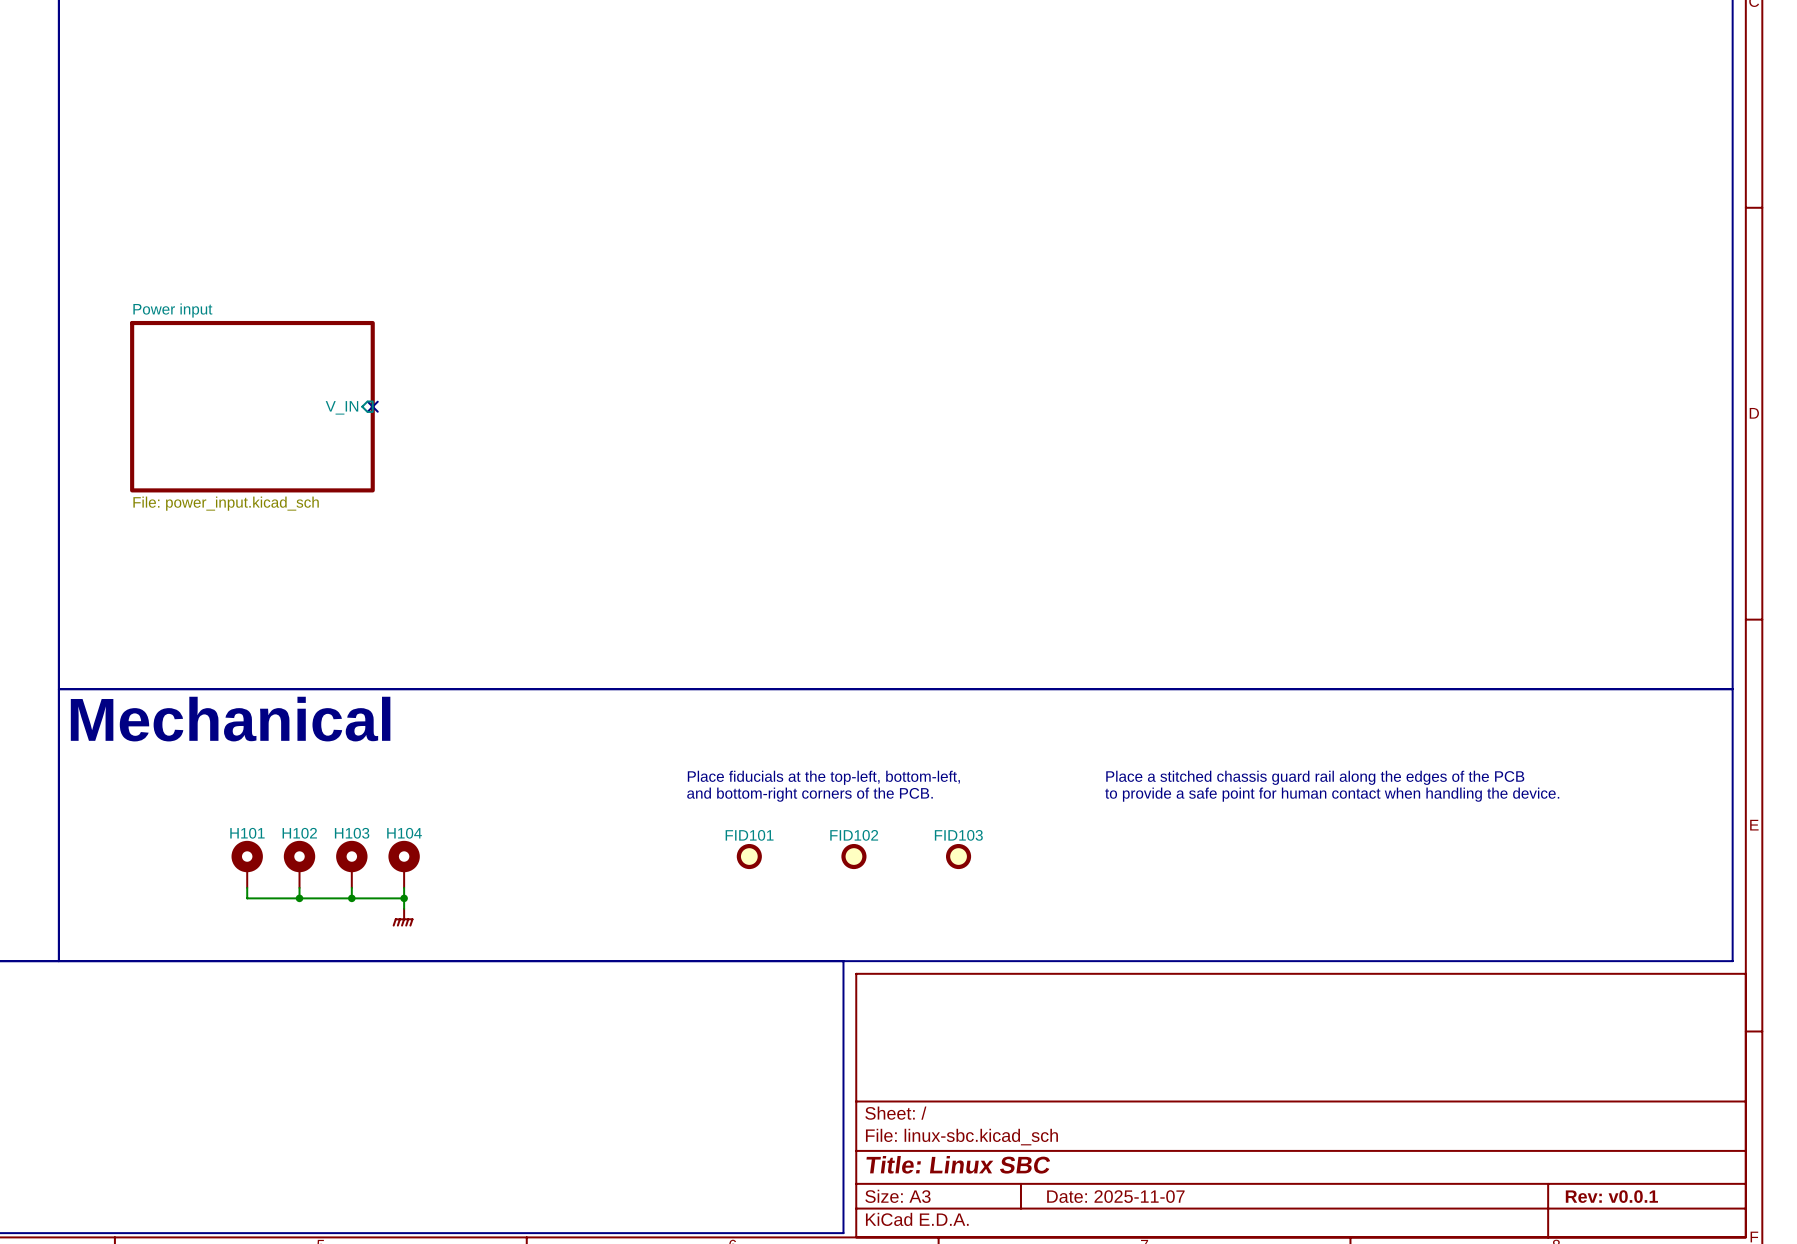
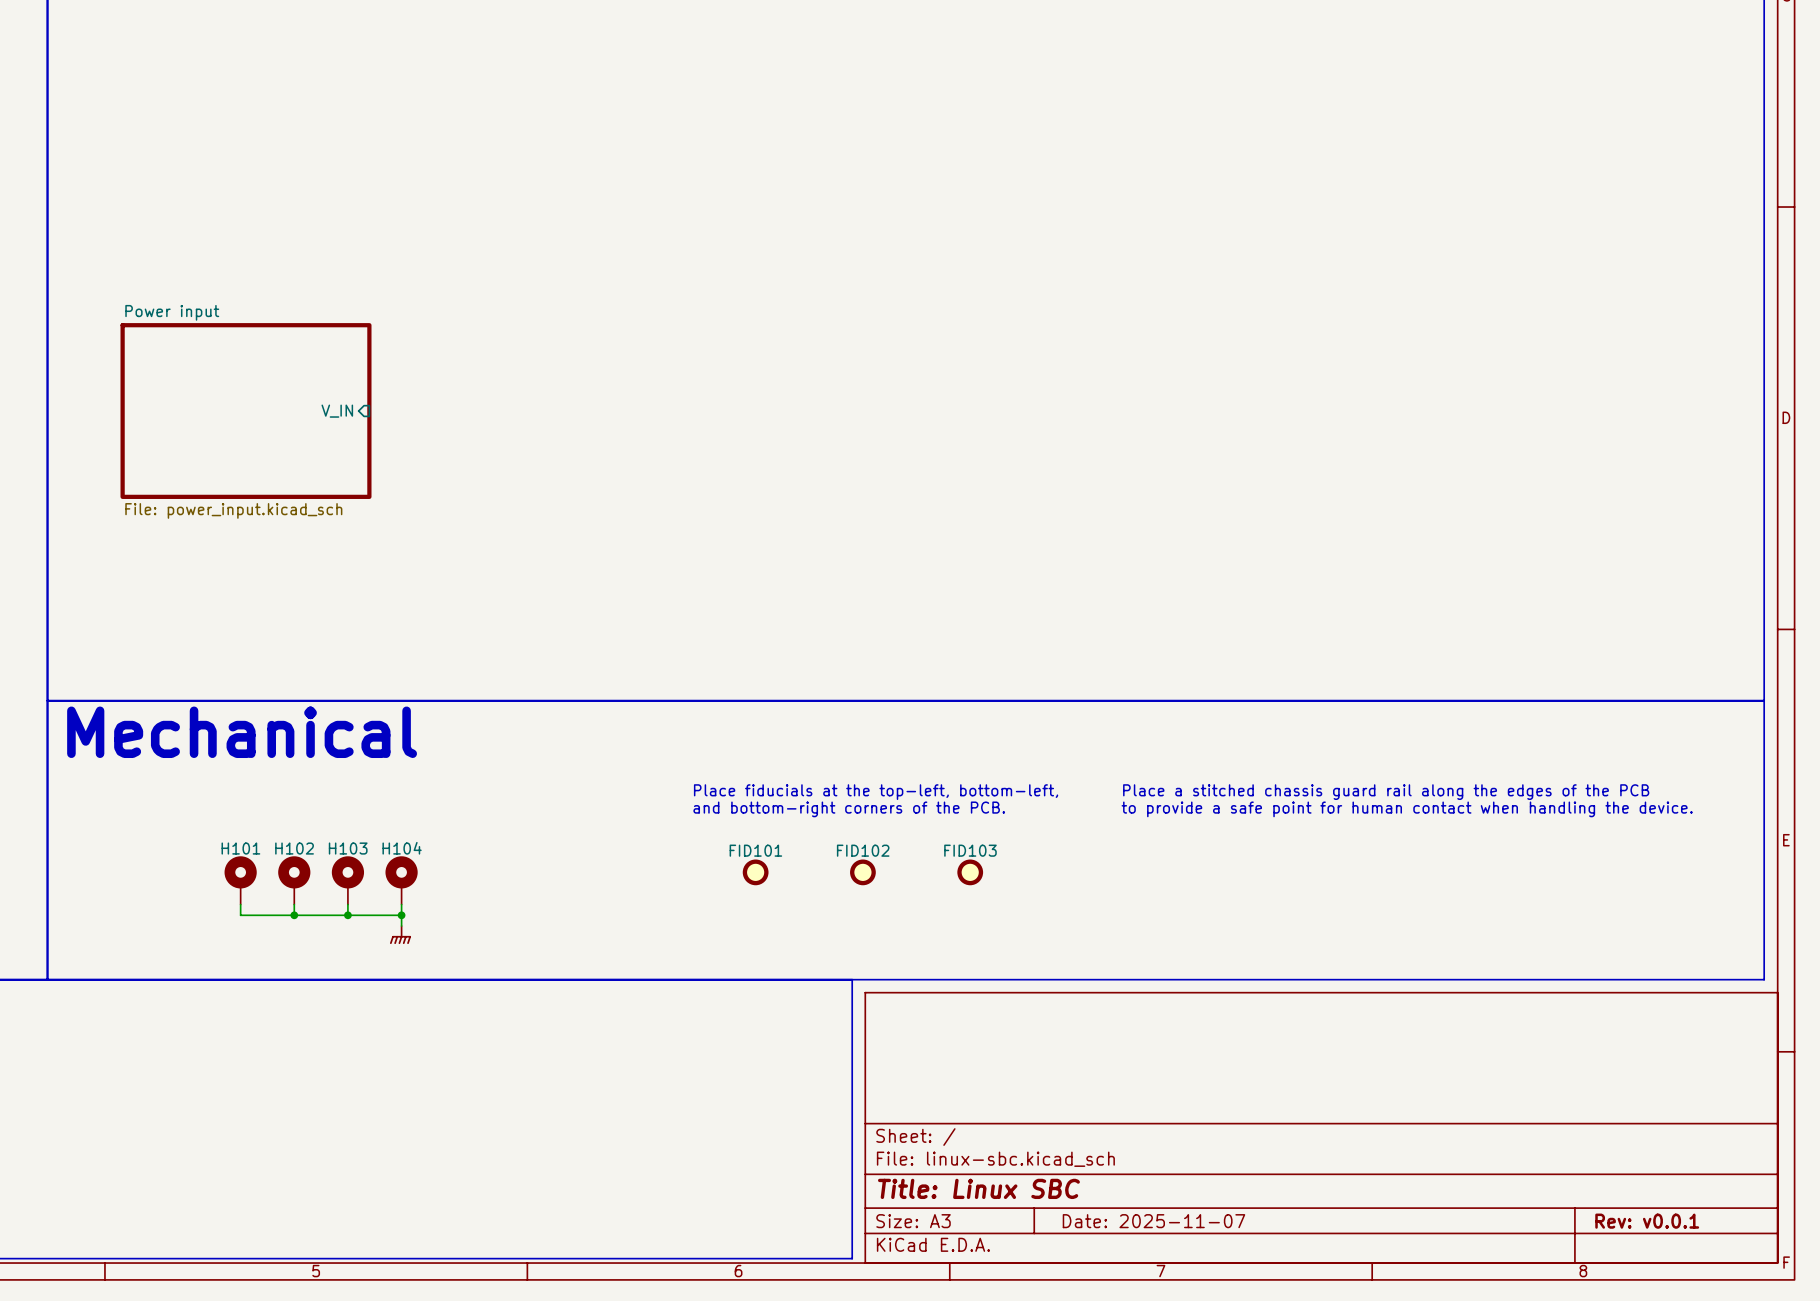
no-connect mark: (372, 406) -> none

